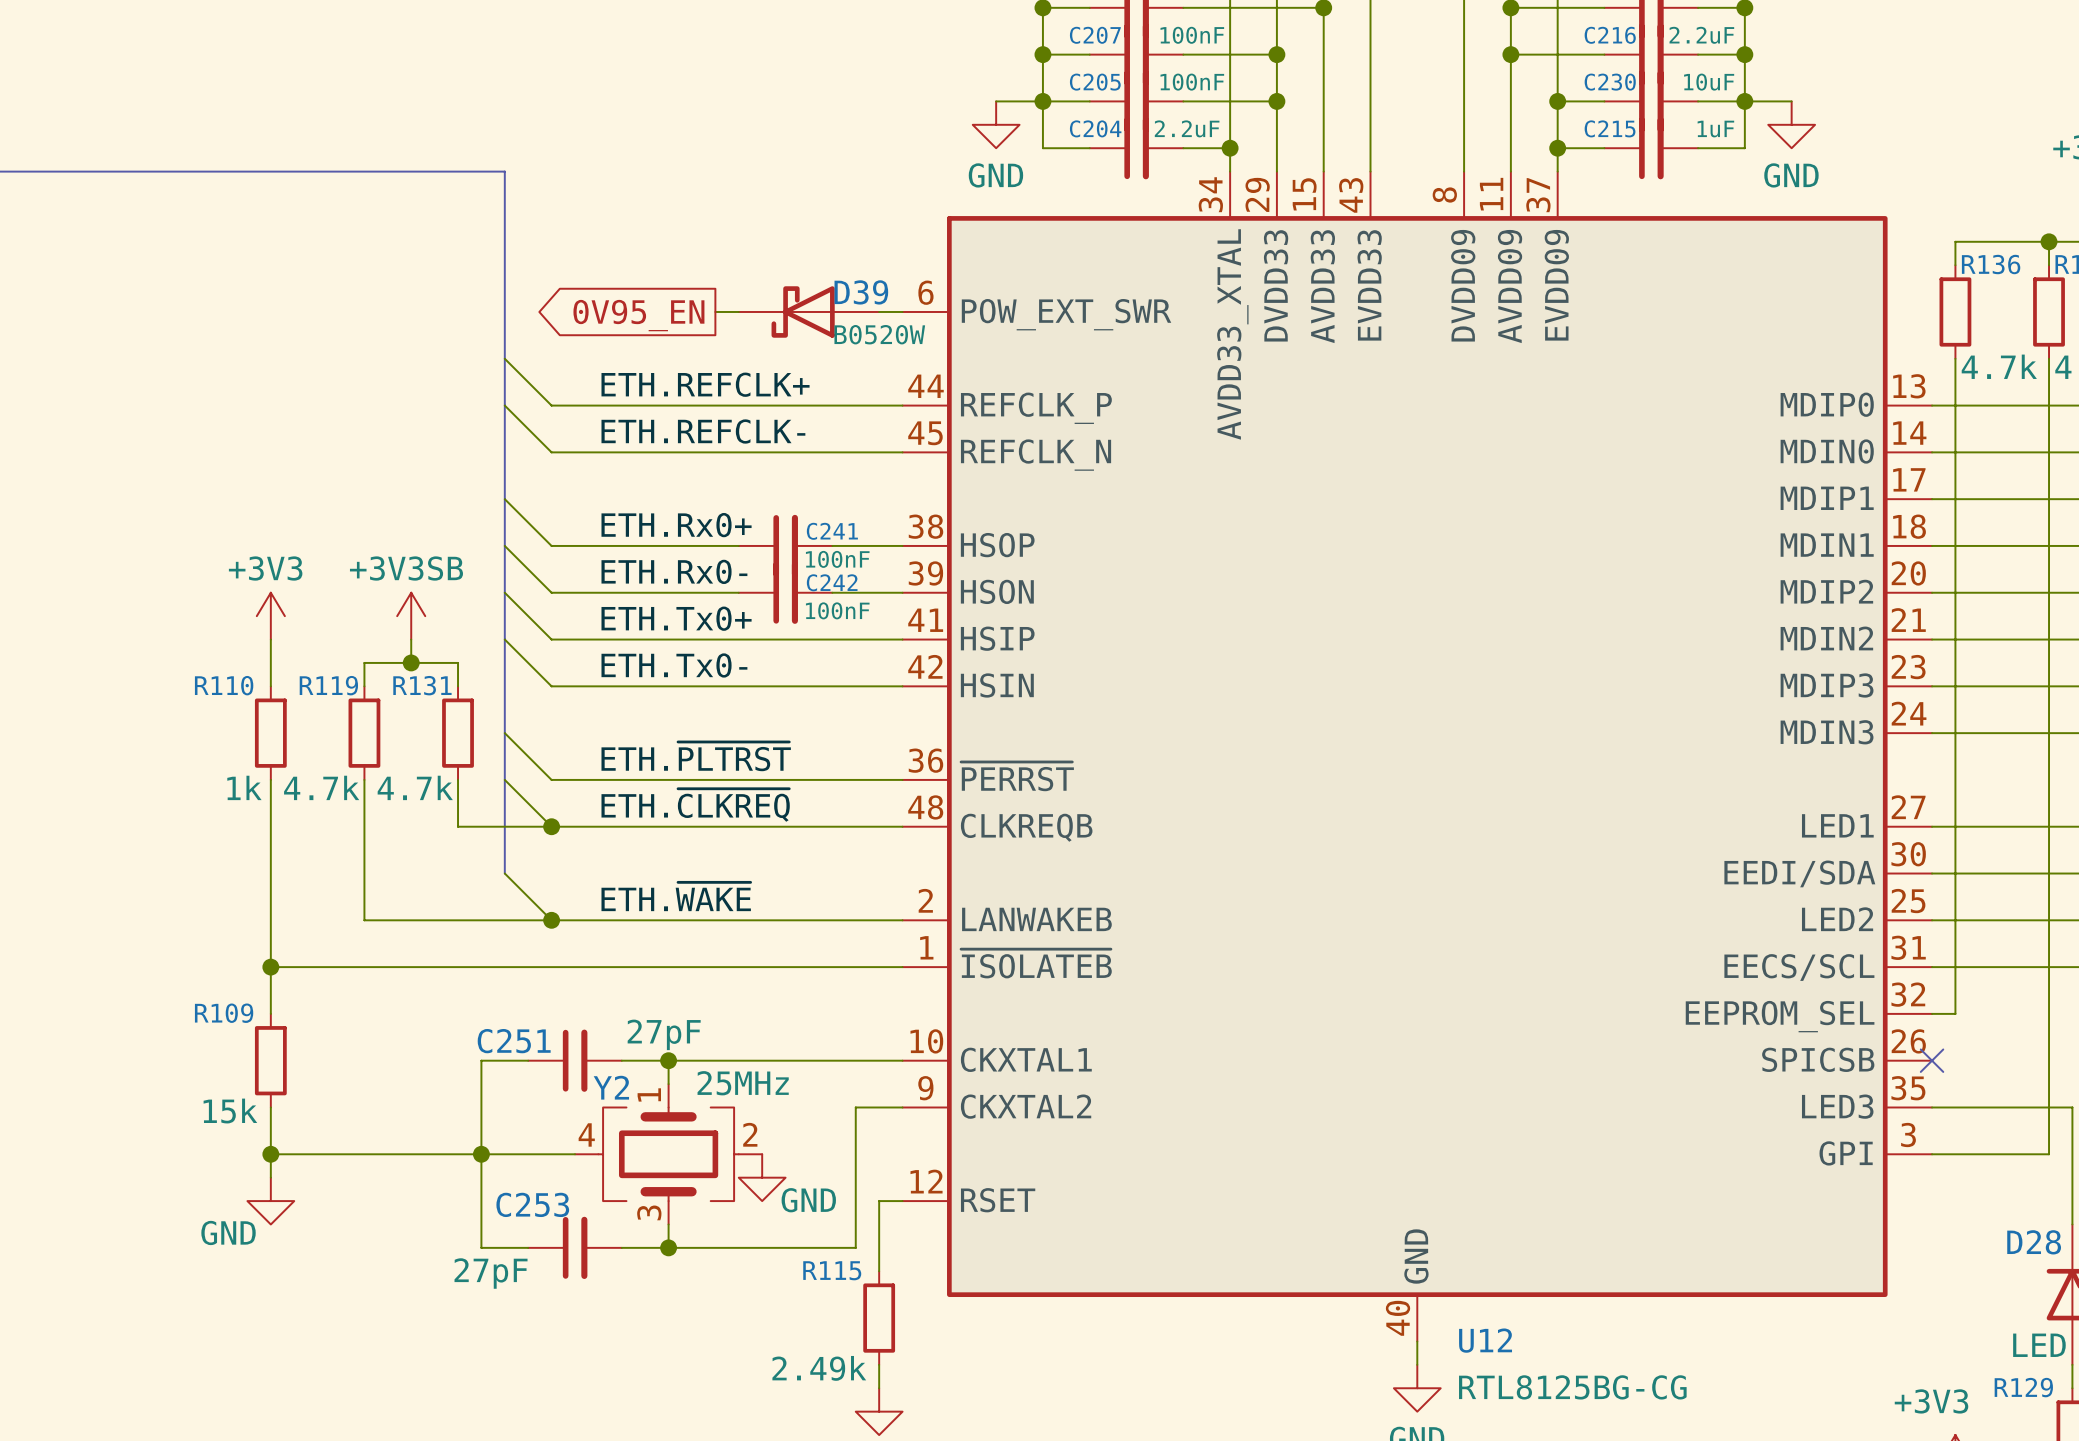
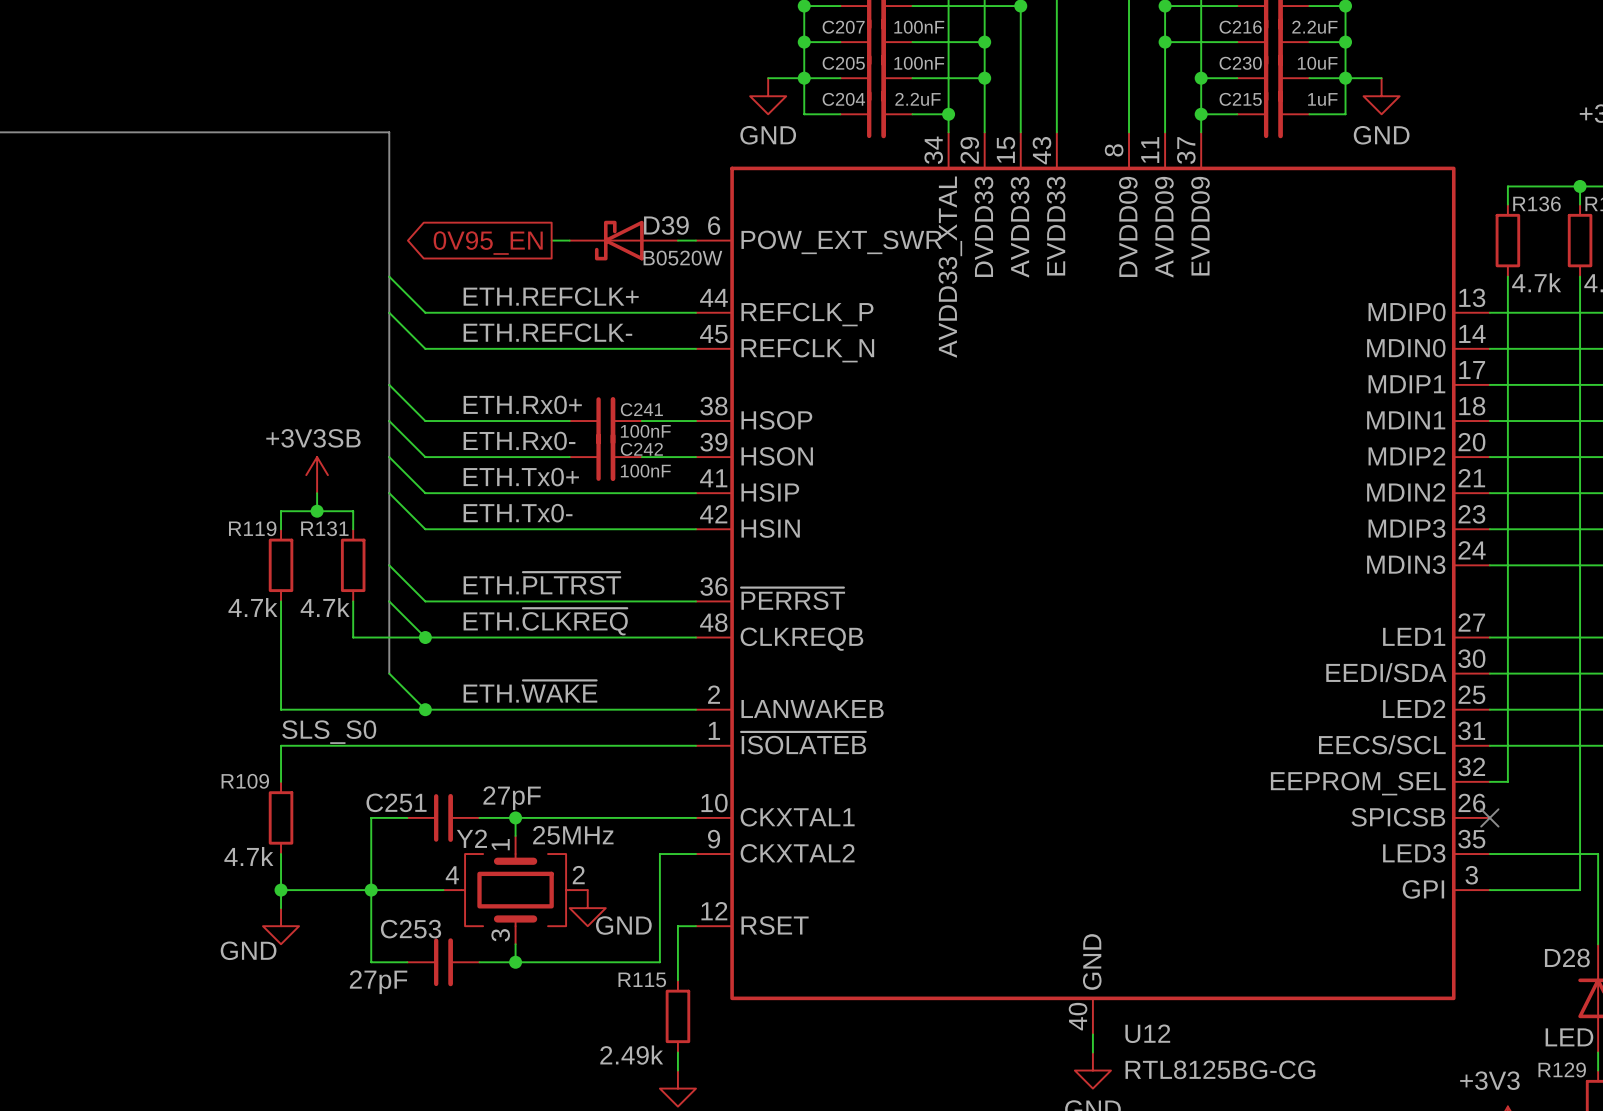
power symbol: +3V3 (270, 616) -> none
wire: (270, 639) (270, 686) -> none
R110: 1k (270, 733) -> none
wire: (270, 779) (270, 1013) -> none
label: none -> SLS_S0 (329, 732)
wire: (270, 967) (364, 967) -> (281, 781) (281, 745)
junction: (270, 967) -> none
R109 position: (270, 1060) -> (281, 817)
wire: (270, 1107) (270, 1177) -> (281, 854) (281, 908)
R109 value: 15k (230, 1111) -> 4.7k (248, 856)
wire: (270, 1154) (364, 1154) -> none
junction position: (270, 1154) -> (281, 890)
power symbol position: GND (270, 1201) -> GND (281, 926)

